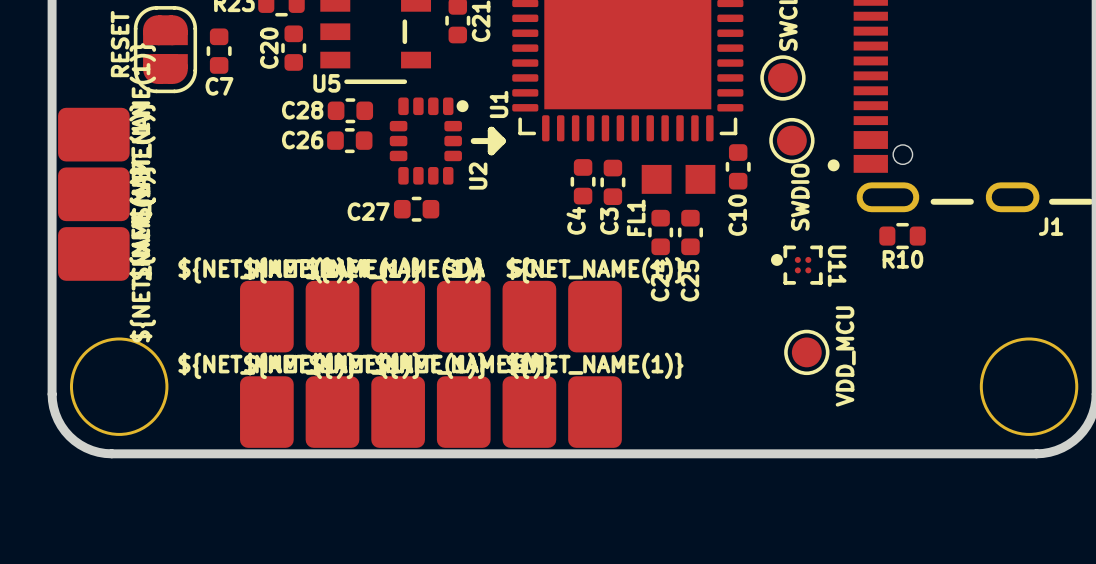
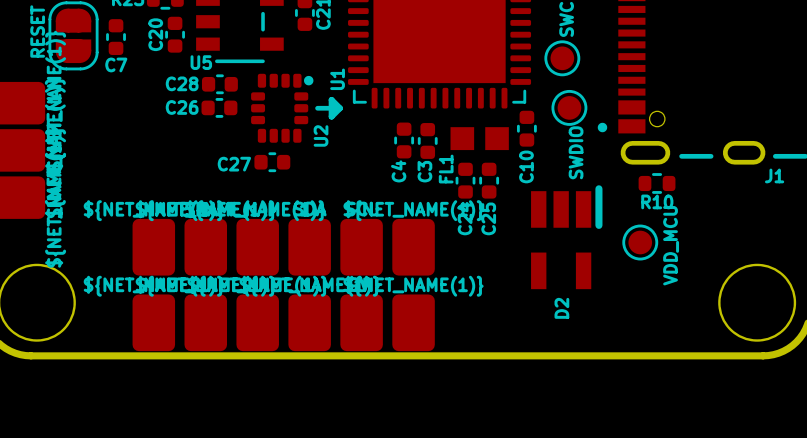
U11: (796, 265) -> none
D2: none -> (566, 237)
part position: (806, 352) -> (640, 242)

